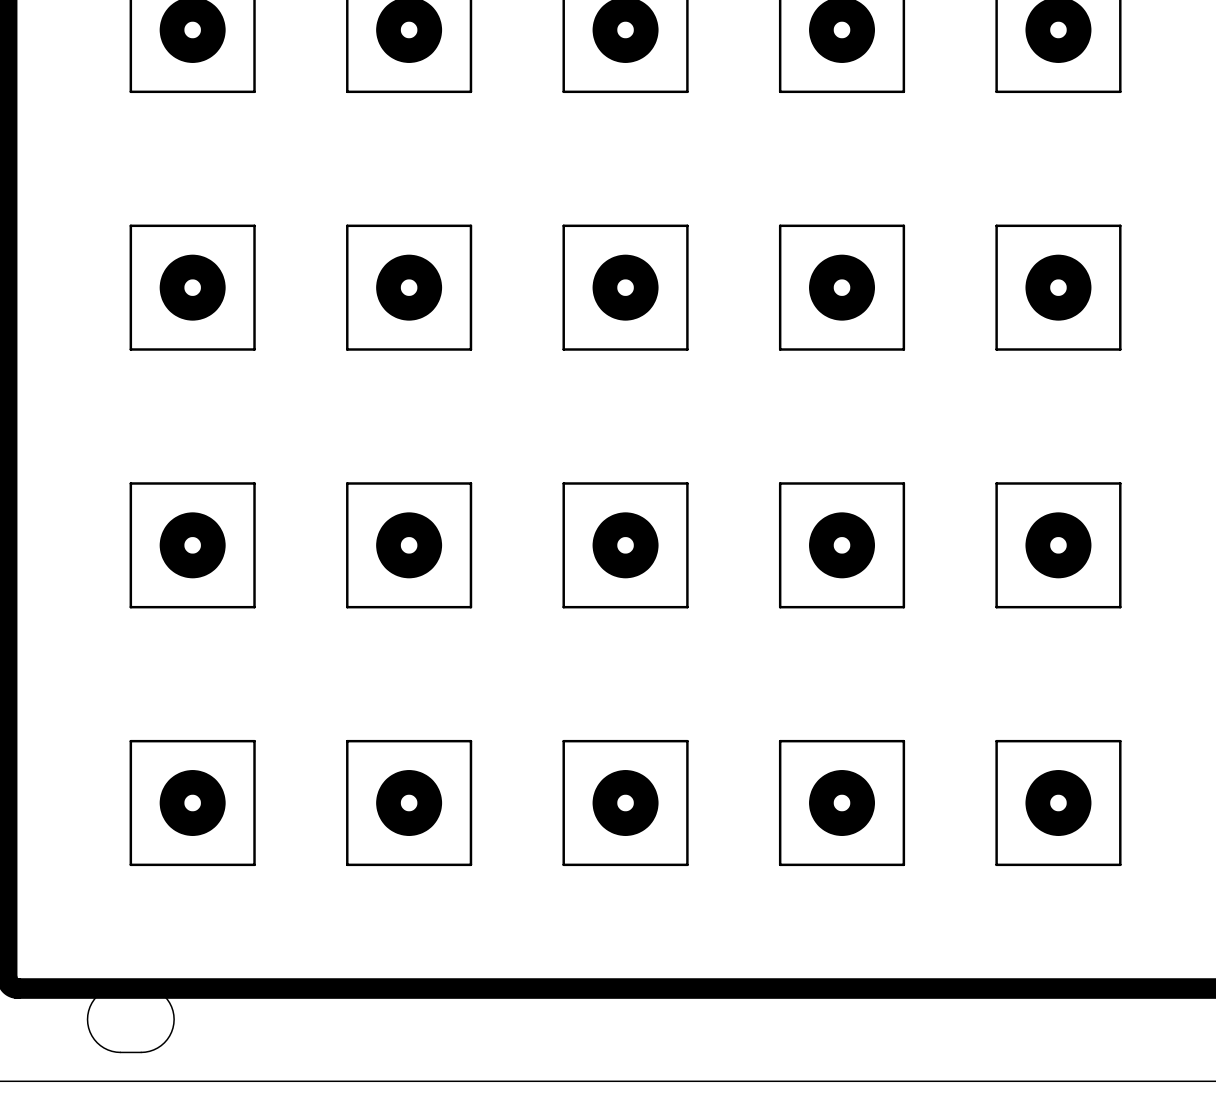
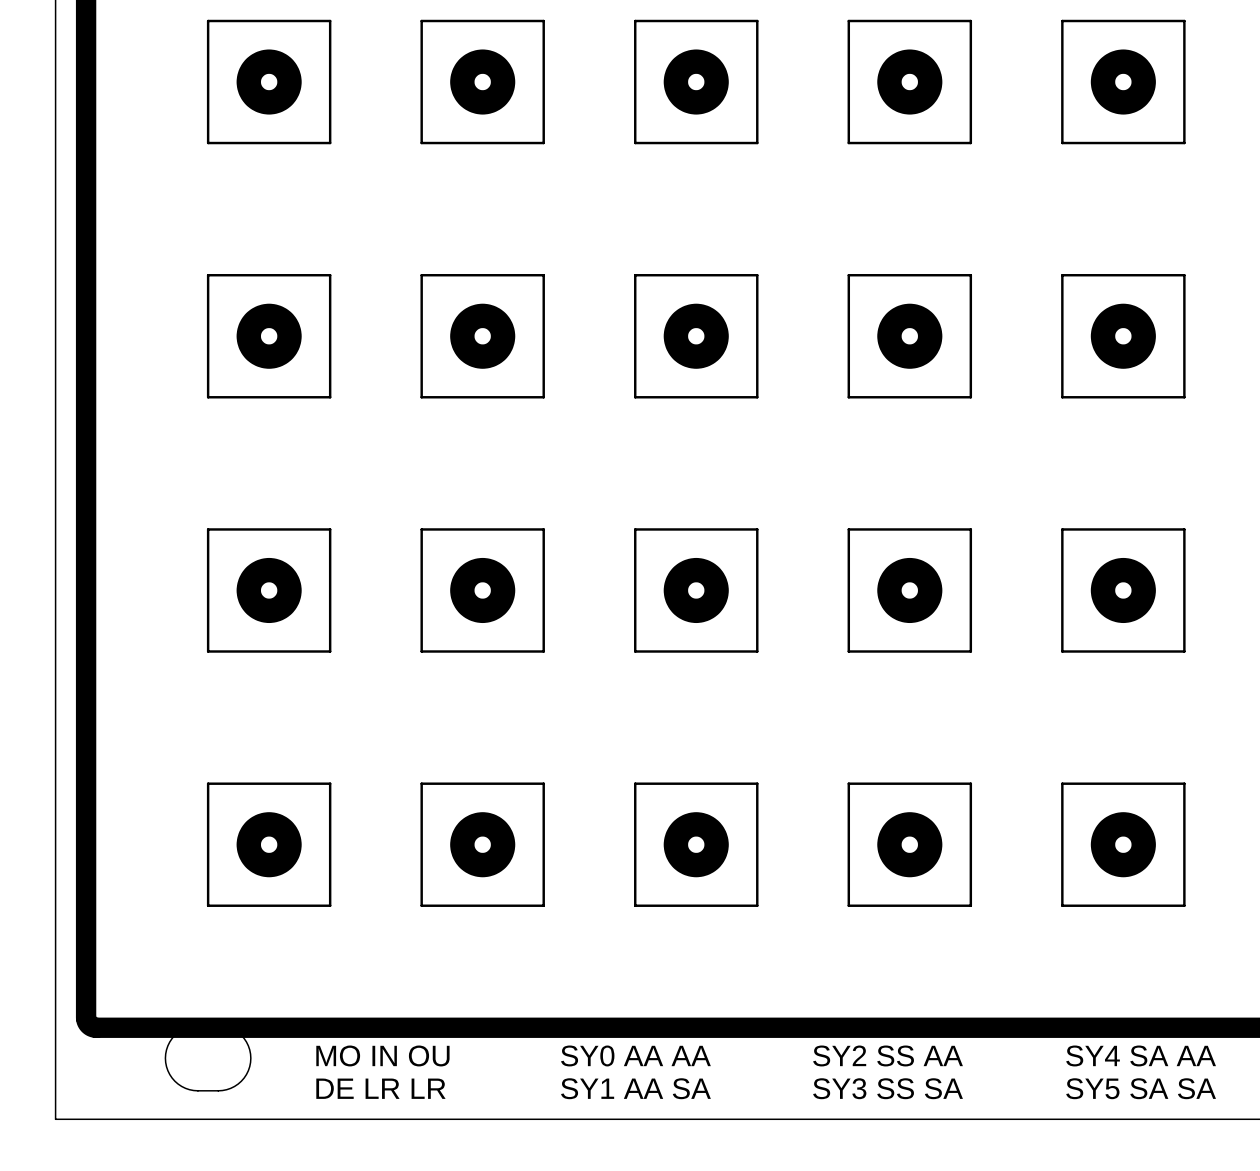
text: none -> MO IN OU (382, 1055)
text: none -> SY0 AA AA (635, 1055)
text: none -> SY2 SS AA (888, 1055)
text: none -> SY4 SA AA (1141, 1055)
text: none -> DE LR LR (380, 1088)
text: none -> SY1 AA SA (635, 1088)
text: none -> SY3 SS SA (888, 1088)
text: none -> SY5 SA SA (1141, 1088)

